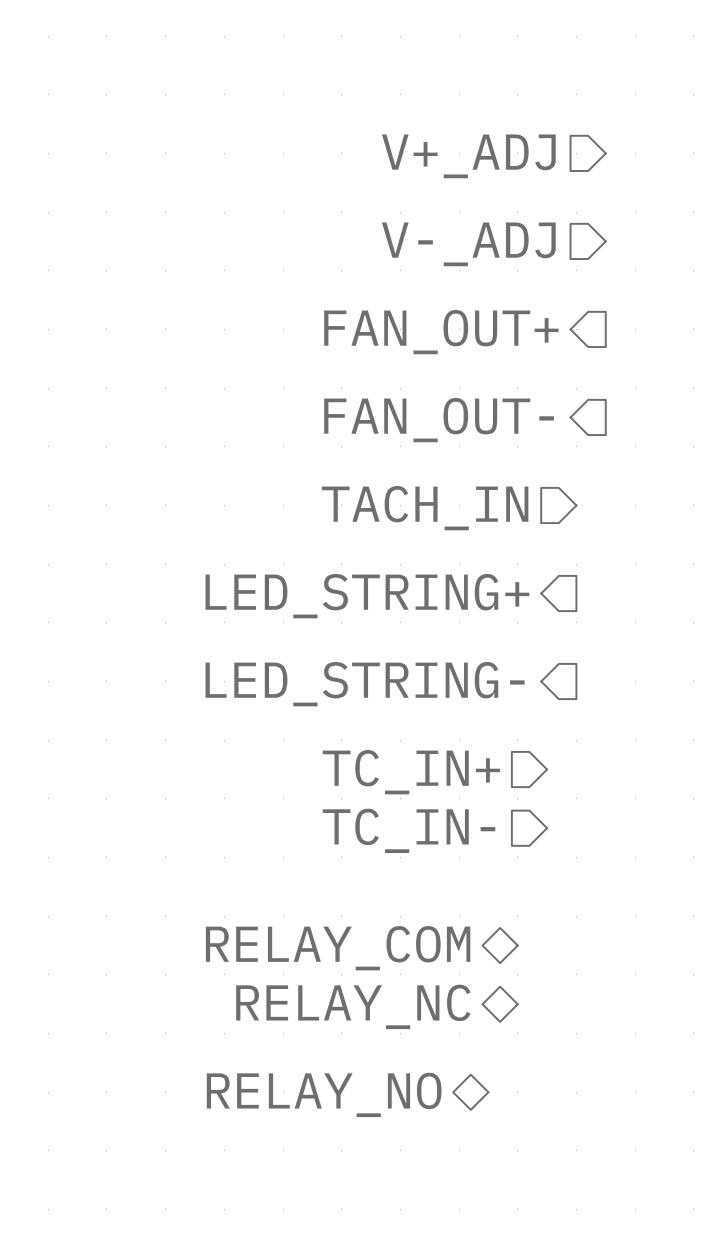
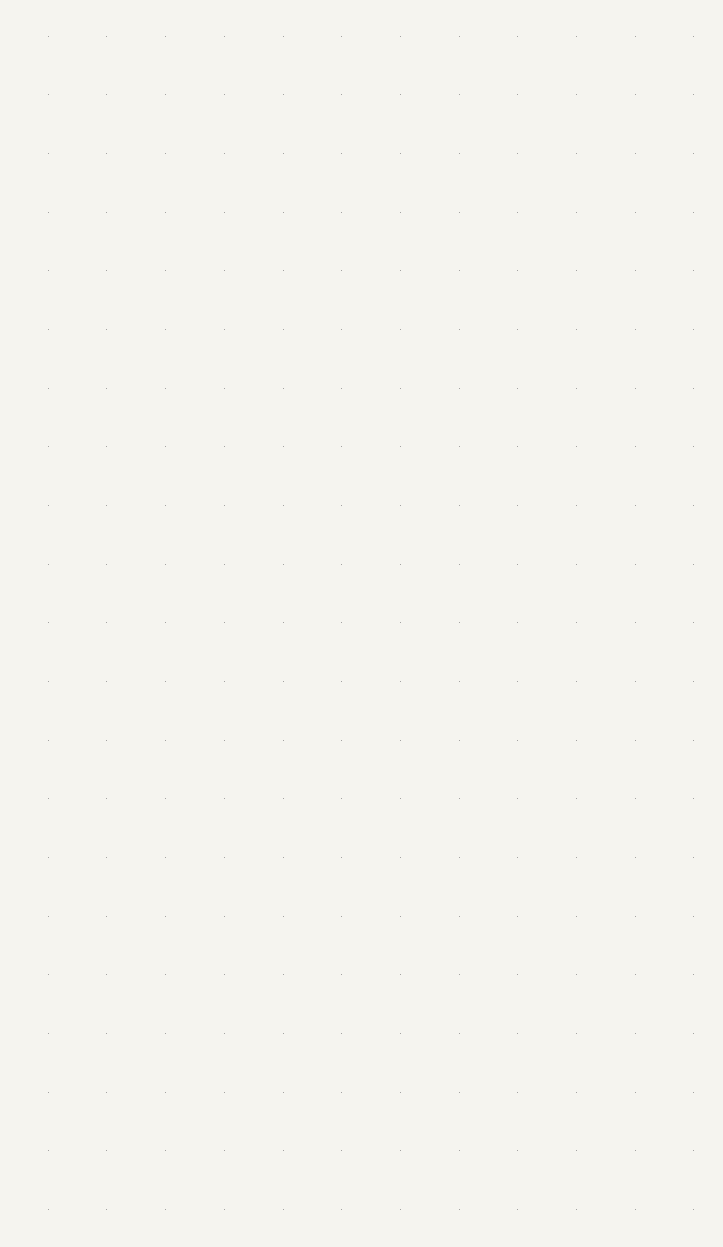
hierarchical label: V+_ADJ (468, 156) -> none
hierarchical label: V-_ADJ (468, 244) -> none
hierarchical label: FAN_OUT+ (441, 332) -> none
hierarchical label: FAN_OUT- (439, 420) -> none
hierarchical label: TACH_IN (425, 508) -> none
hierarchical label: LED_STRING+ (367, 596) -> none
hierarchical label: LED_STRING- (365, 684) -> none
hierarchical label: TC_IN+ (411, 772) -> none
hierarchical label: TC_IN- (408, 830) -> none
hierarchical label: RELAY_COM (338, 948) -> none
hierarchical label: RELAY_NC (353, 1006) -> none
hierarchical label: RELAY_NO (324, 1094) -> none

